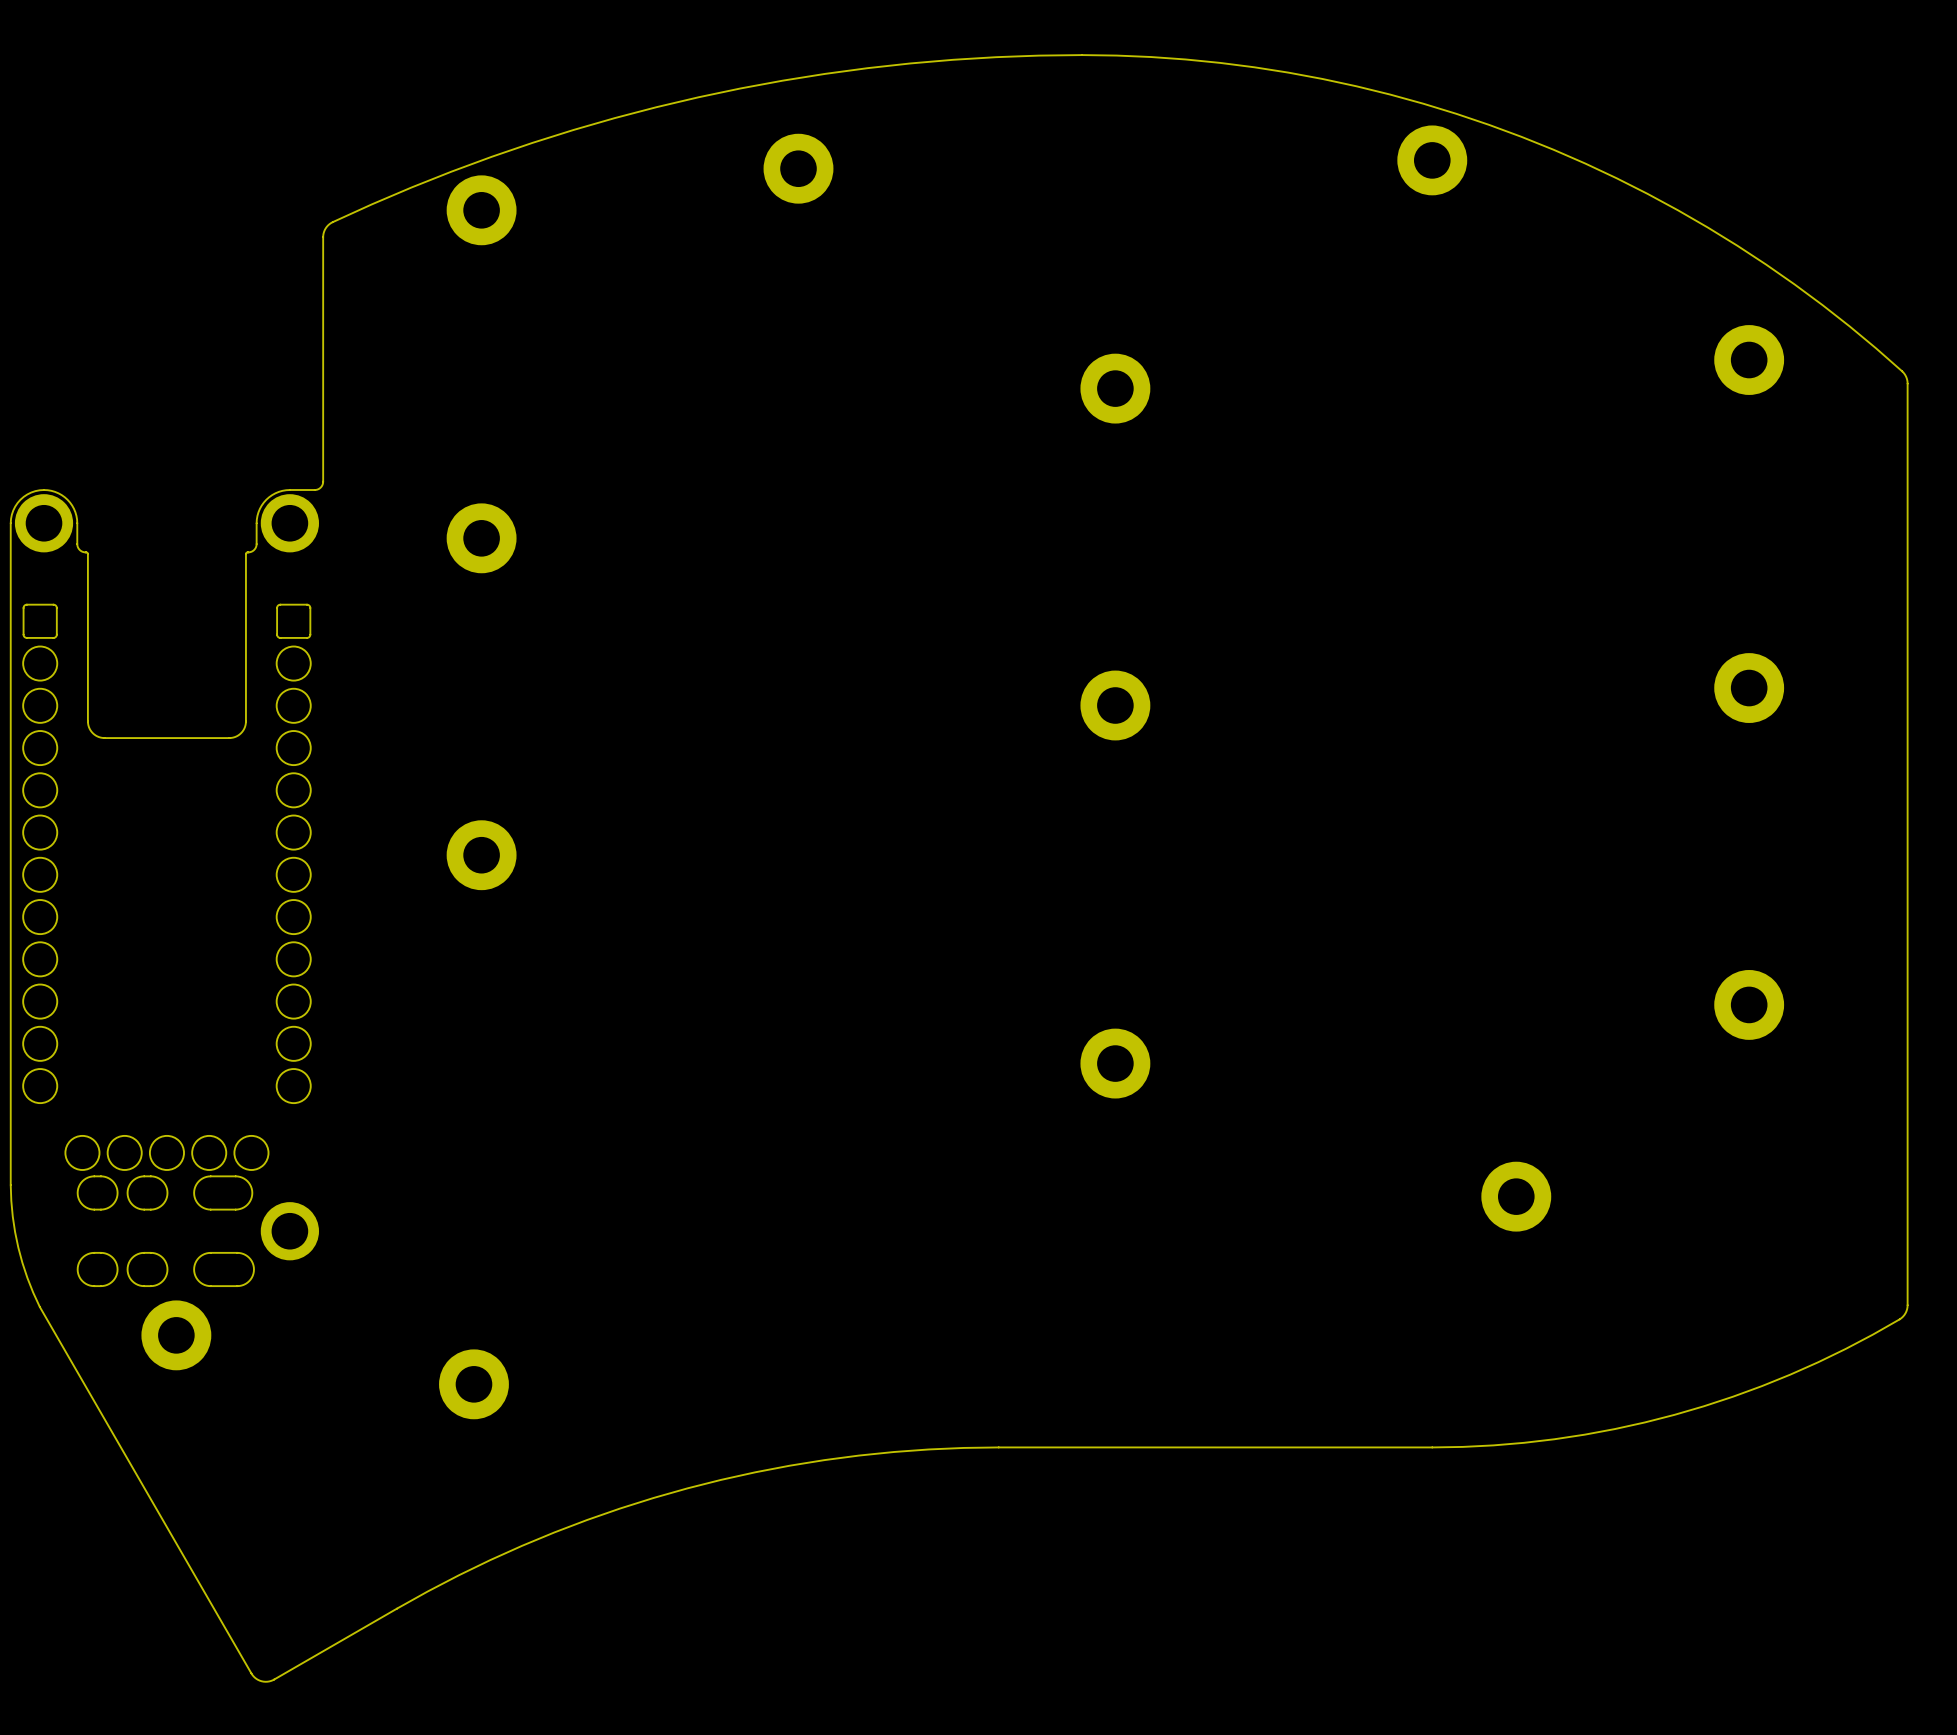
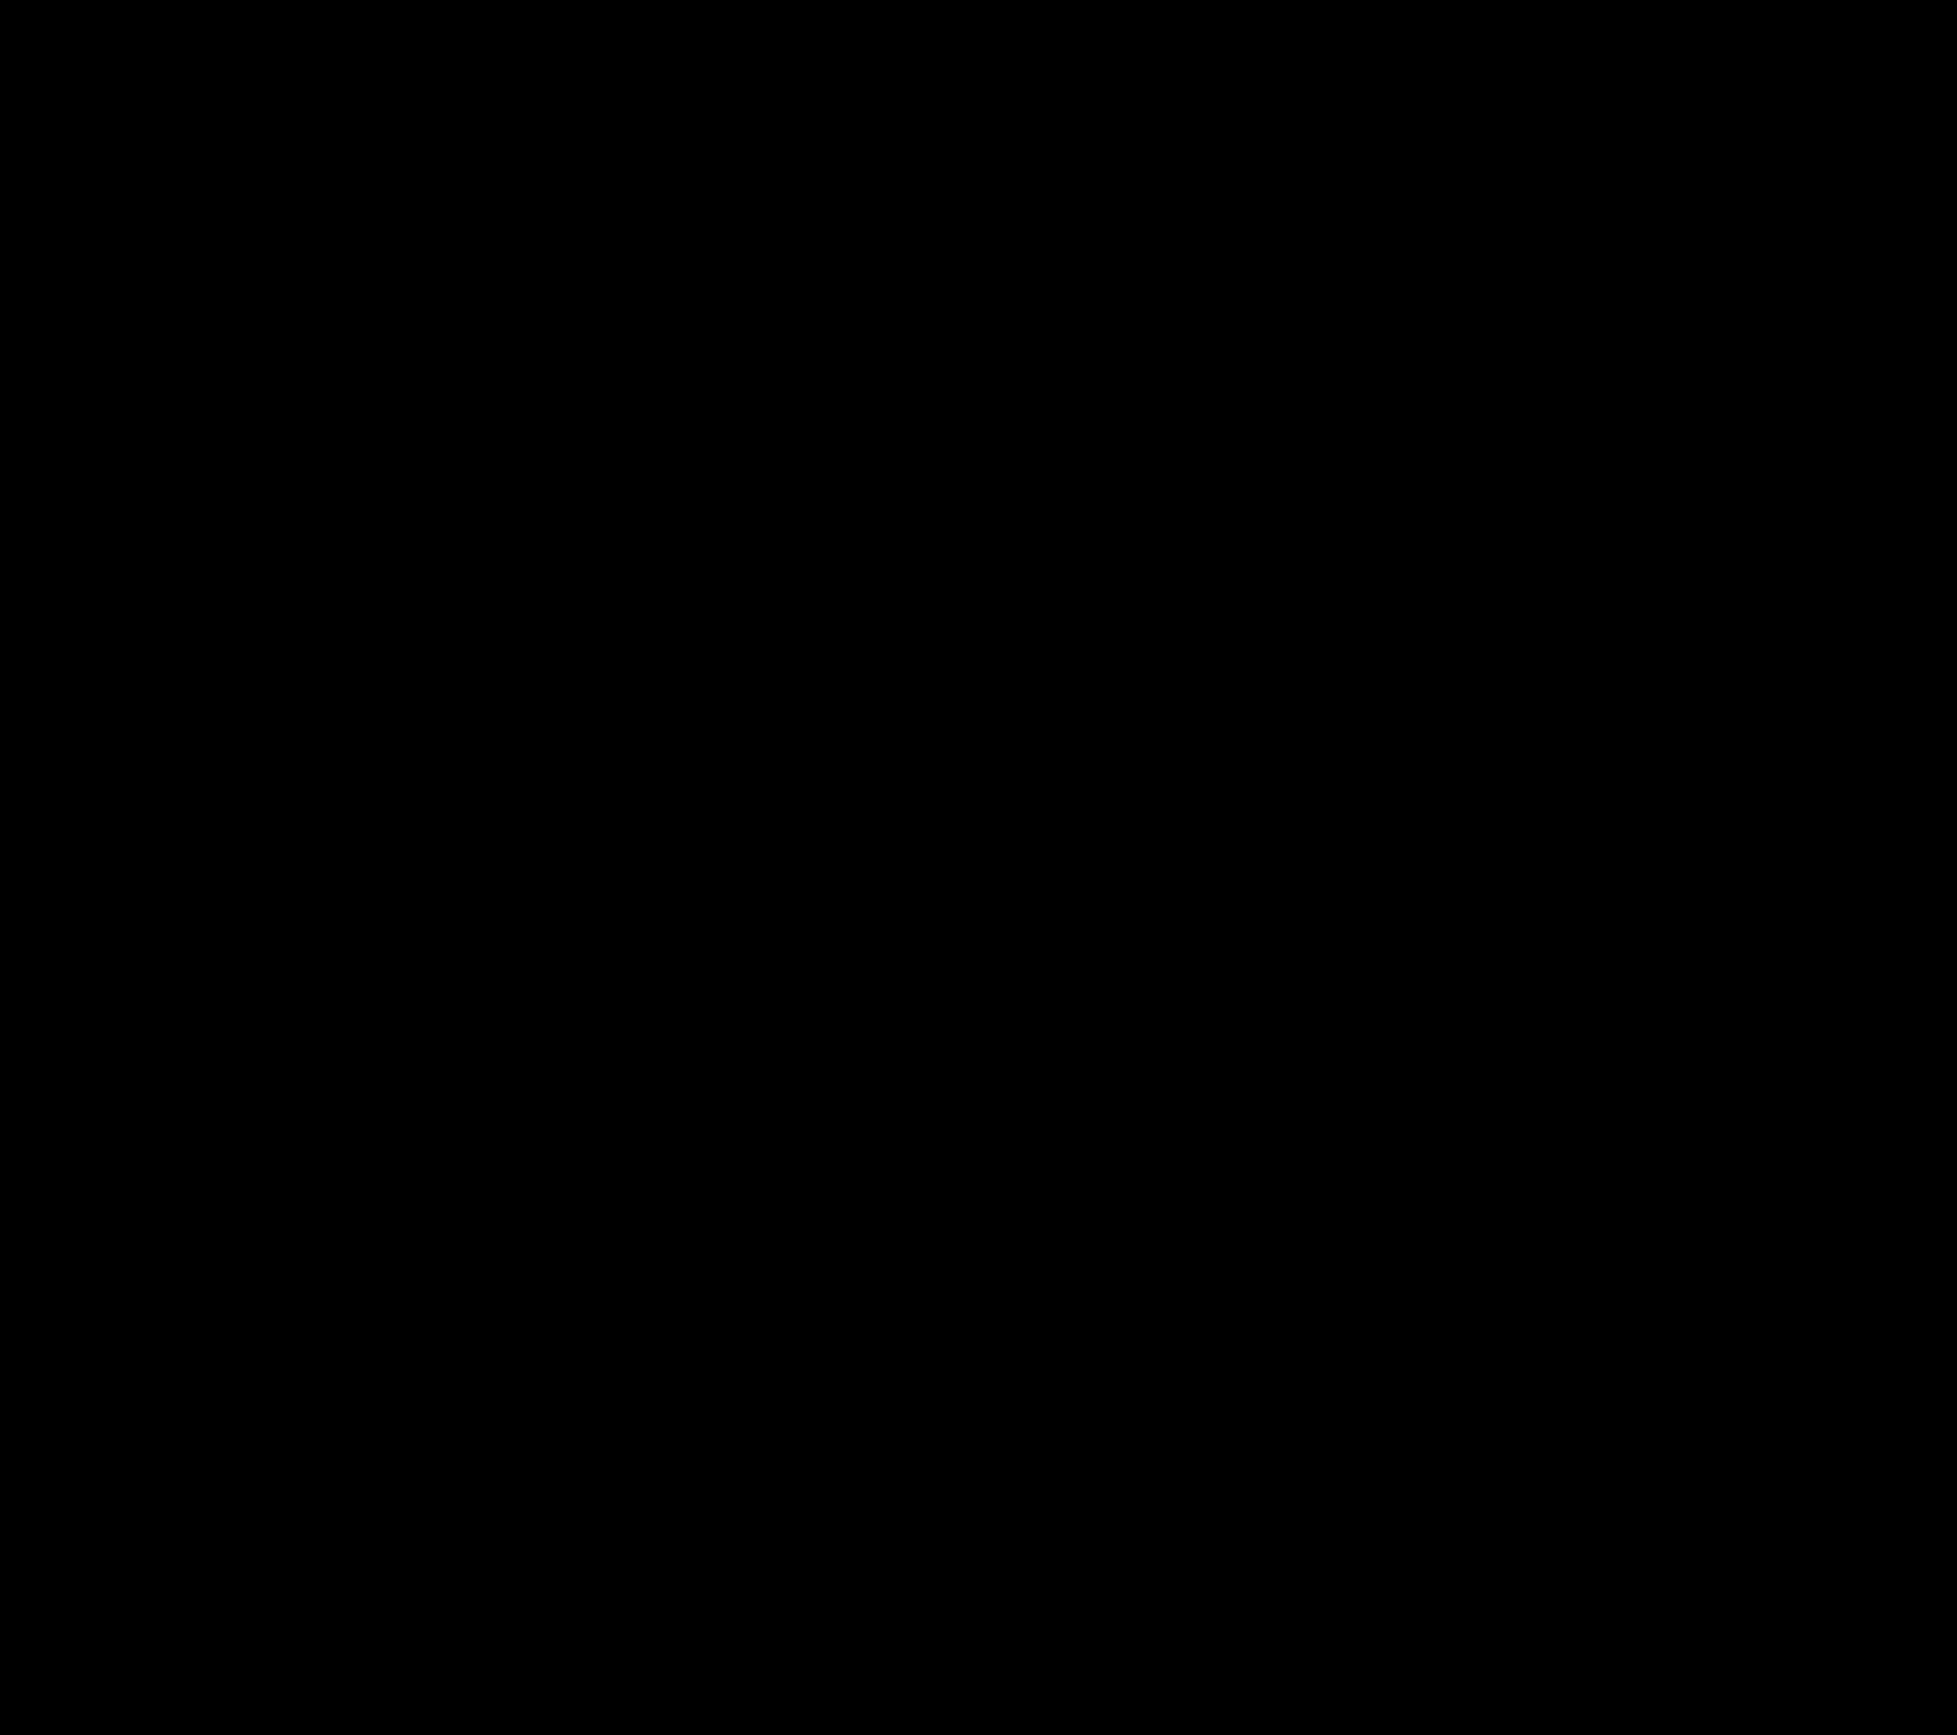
board edge: (1082, 55) (996, 57) (910, 63) (825, 73) (698, 97) (614, 118) (491, 156) (411, 187) (329, 224) (324, 229) (323, 237) (323, 482) (317, 489) (286, 490) (275, 493) (263, 502) (258, 512) (256, 546) (253, 550) (245, 553) (245, 721) (243, 730) (236, 736) (229, 738) (104, 738) (92, 733) (87, 721) (87, 553) (80, 550) (77, 546) (75, 512) (64, 497) (47, 490) (35, 491) (27, 494) (15, 506) (10, 523) (10, 1185) (15, 1232) (22, 1262) (39, 1306) (251, 1673) (258, 1679) (267, 1681) (274, 1679) (427, 1591) (522, 1545) (620, 1508) (721, 1479) (824, 1460) (928, 1449) (998, 1447) (1432, 1447) (1493, 1445) (1554, 1439) (1644, 1422) (1733, 1396) (1818, 1362) (1873, 1334) (1899, 1319) (1905, 1313) (1907, 1305) (1907, 383) (1904, 373) (1822, 305) (1737, 245) (1647, 193) (1585, 163) (1521, 136) (1423, 103) (1322, 78) (1220, 62) (1151, 57) (1082, 55) -> none
part: (1432, 160) -> none
part: (798, 168) -> none
part: (481, 210) -> none
part: (1749, 360) -> none
part: (1115, 388) -> none
part: (44, 523) -> none
part: (289, 523) -> none
part: (481, 538) -> none
drawing: [22, 604, 312, 1104] -> none
part: (1749, 688) -> none
part: (1115, 705) -> none
part: (481, 855) -> none
part: (1749, 1004) -> none
part: (1115, 1063) -> none
drawing: [64, 1135, 269, 1287] -> none
part: (1516, 1196) -> none
part: (289, 1231) -> none
part: (176, 1335) -> none
part: (473, 1384) -> none

